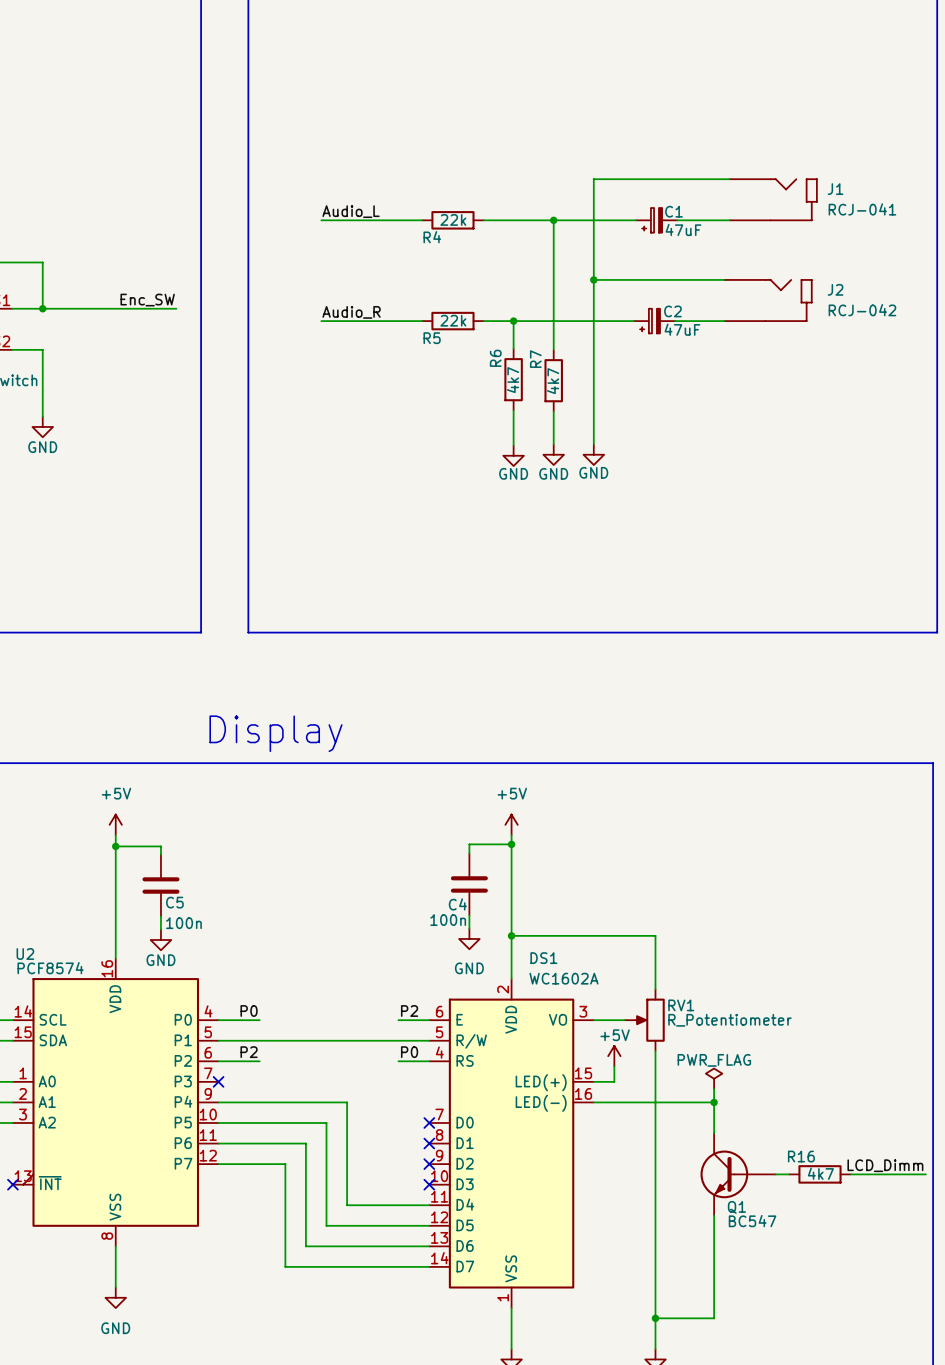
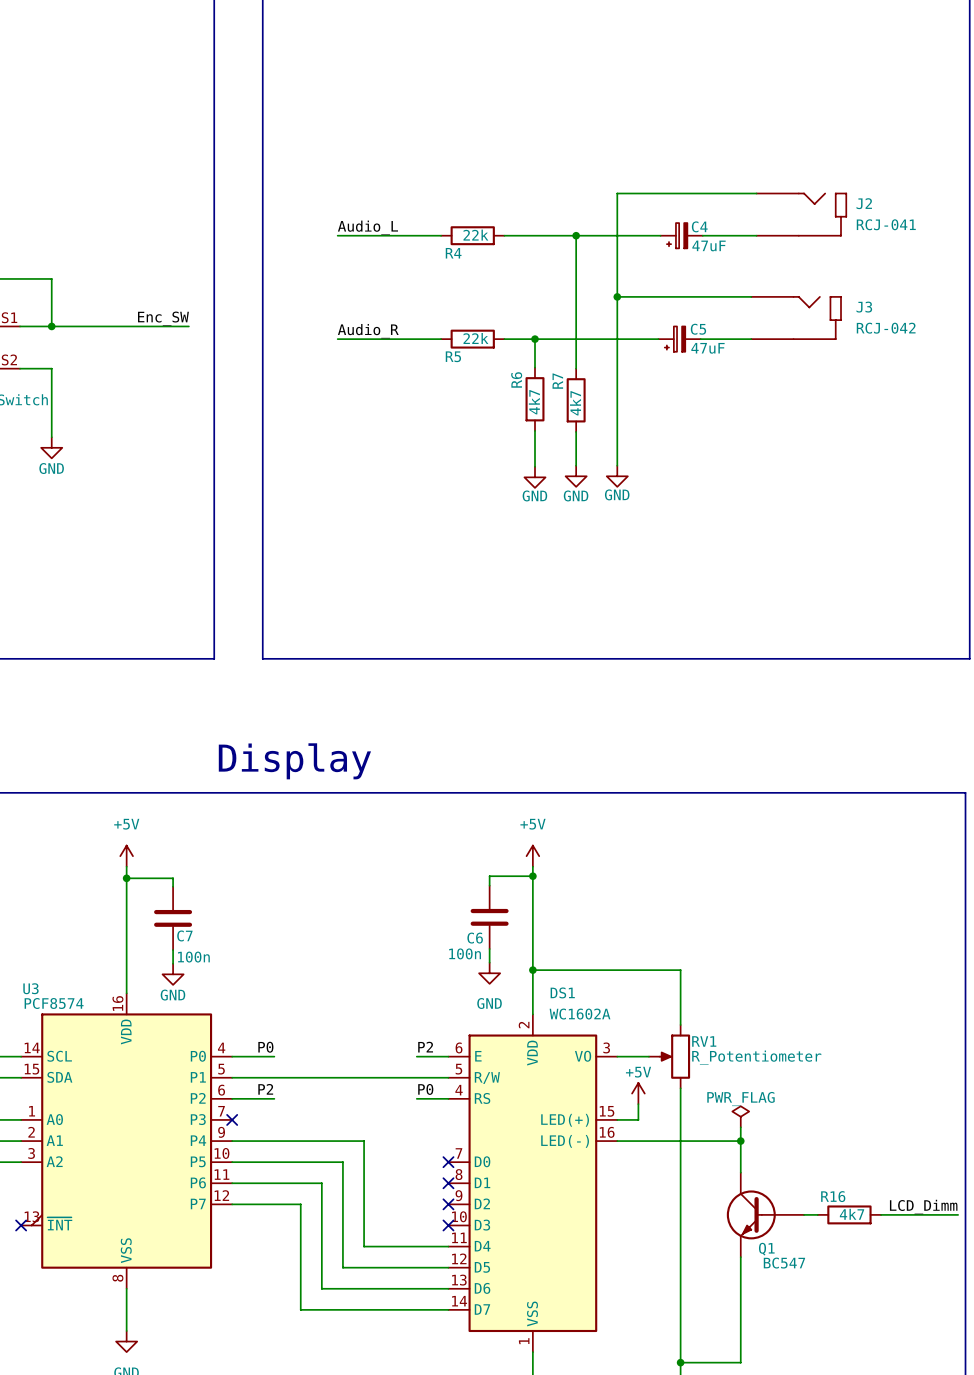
J1 name: J1 (835, 189) -> J2 (864, 203)
C1 name: C1 (673, 211) -> C4 (699, 226)
J2 name: J2 (835, 289) -> J3 (864, 307)
C2 name: C2 (672, 311) -> C5 (698, 329)
C5 name: C5 (174, 902) -> C7 (184, 935)
C4 name: C4 (457, 904) -> C6 (475, 938)
U2 name: U2 (25, 954) -> U3 (30, 988)

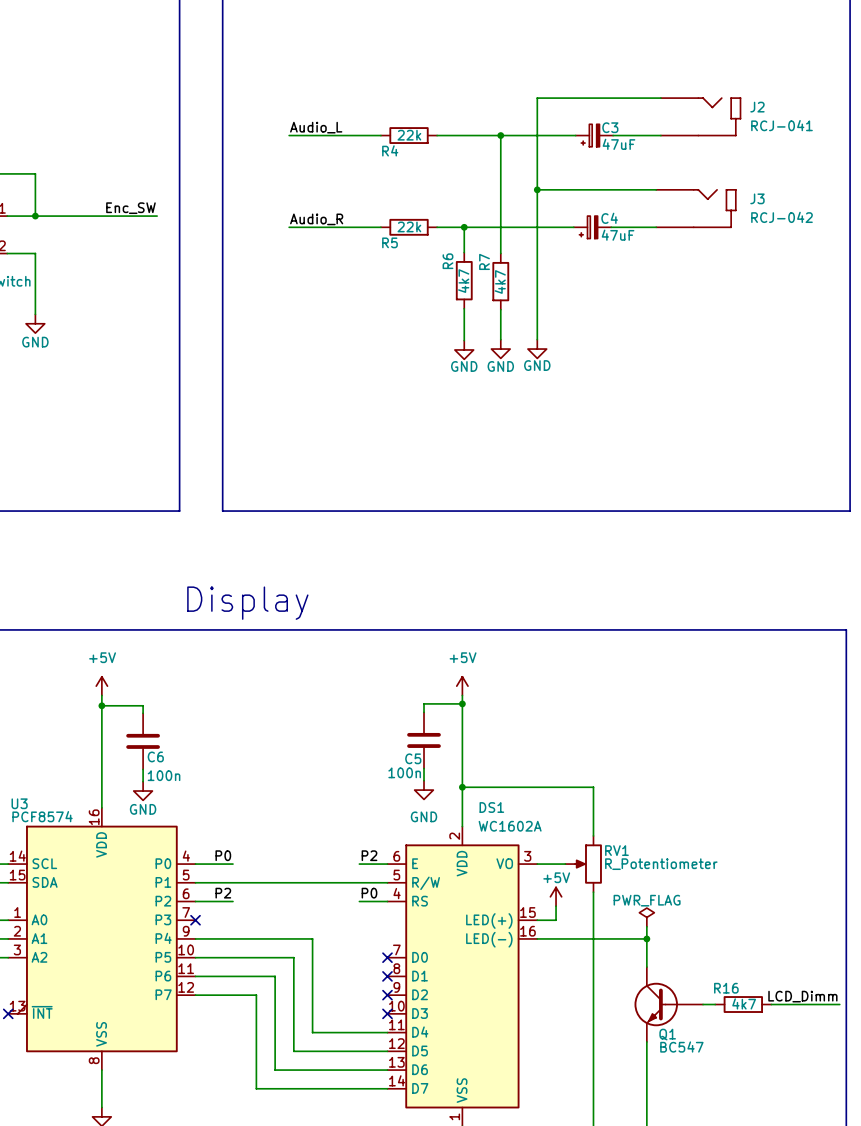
C4 name: C4 (699, 226) -> C3 (610, 127)
C5 name: C5 (698, 329) -> C4 (609, 218)
C7 name: C7 (184, 935) -> C6 (155, 756)
C6 name: C6 (475, 938) -> C5 (413, 758)

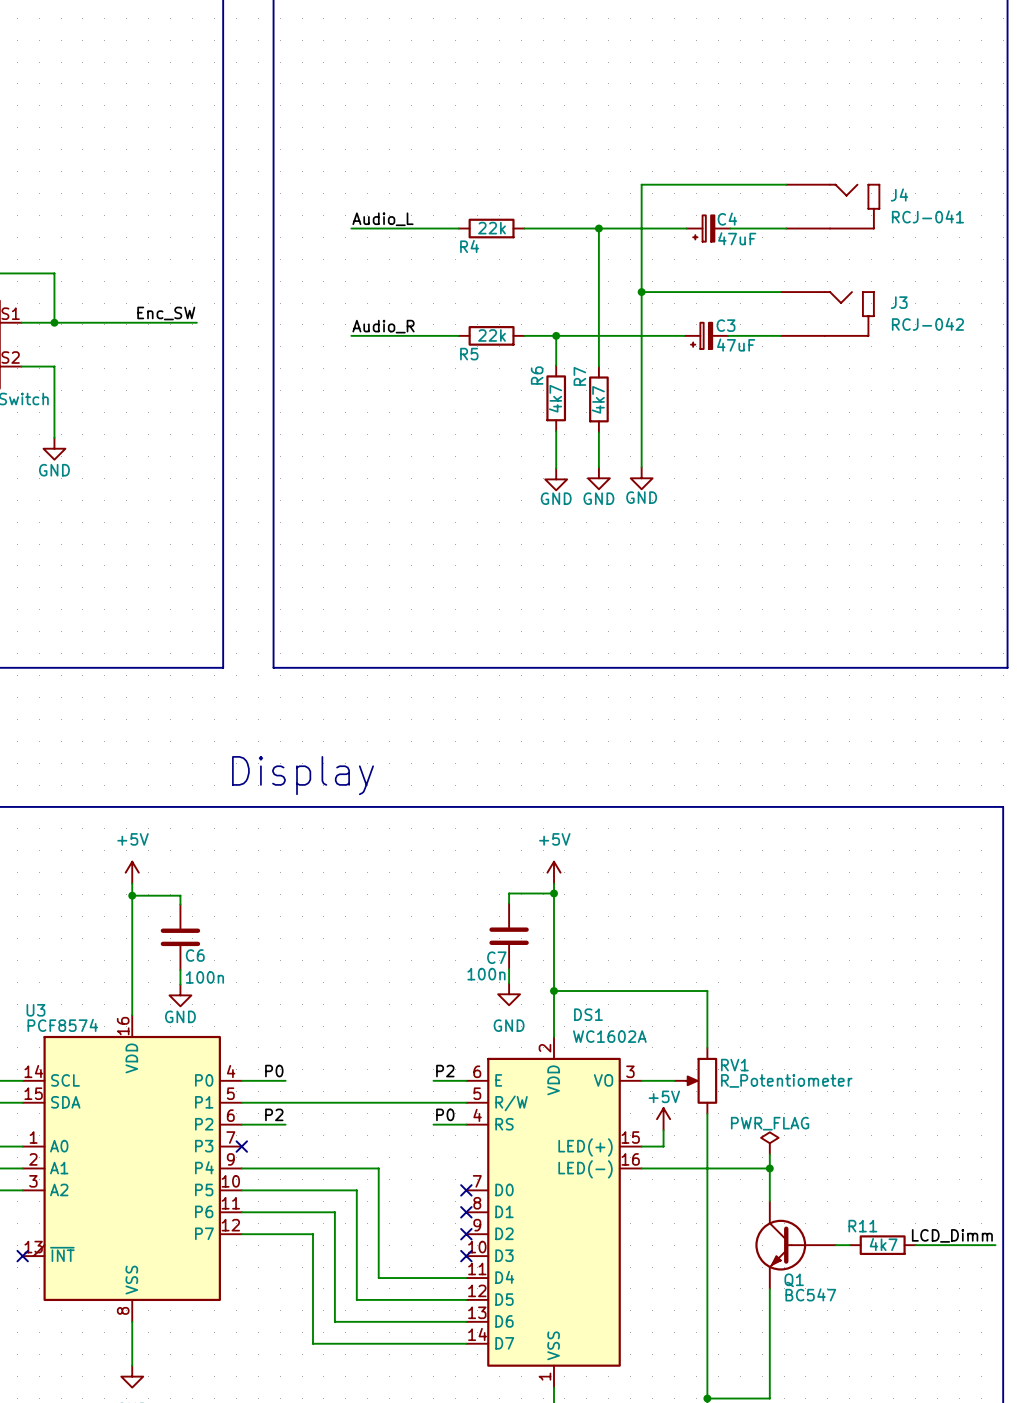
J2 name: J2 (757, 107) -> J4 (899, 194)
C3 name: C3 (610, 127) -> C4 (727, 219)
C4 name: C4 (609, 218) -> C3 (726, 325)
C5 name: C5 (413, 758) -> C7 (496, 957)
R16 name: R16 (726, 988) -> R11 (862, 1226)

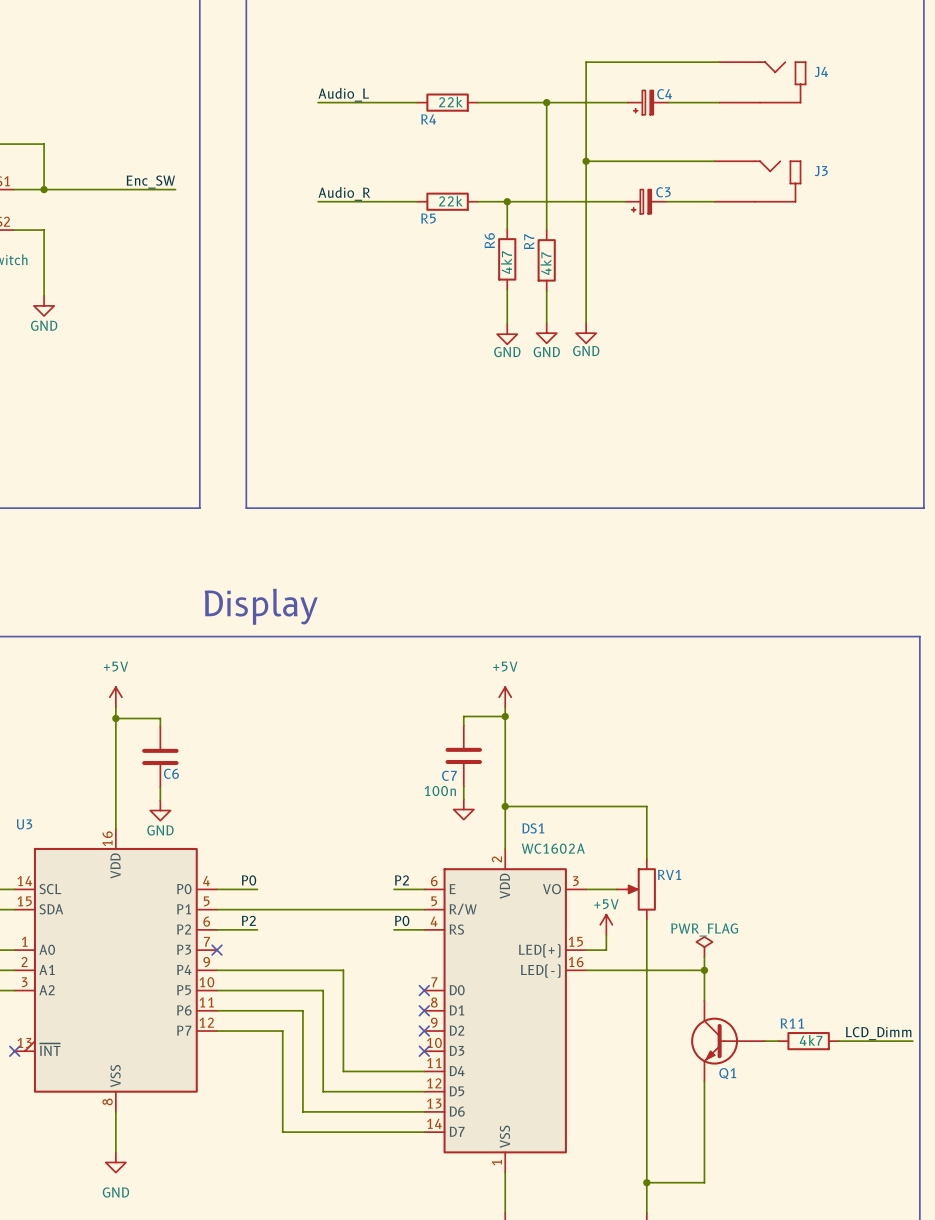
J4 value: RCJ-041 (927, 216) -> none
C4 value: 47uF (737, 238) -> none
J3 value: RCJ-042 (927, 324) -> none
C3 value: 47uF (736, 345) -> none
C6 value: 100n (204, 977) -> none
U3 value: PCF8574 (62, 1025) -> none
power symbol text: GND (509, 1025) -> none
RV1 value: R_Potentiometer (786, 1080) -> none
Q1 value: BC547 (810, 1294) -> none

